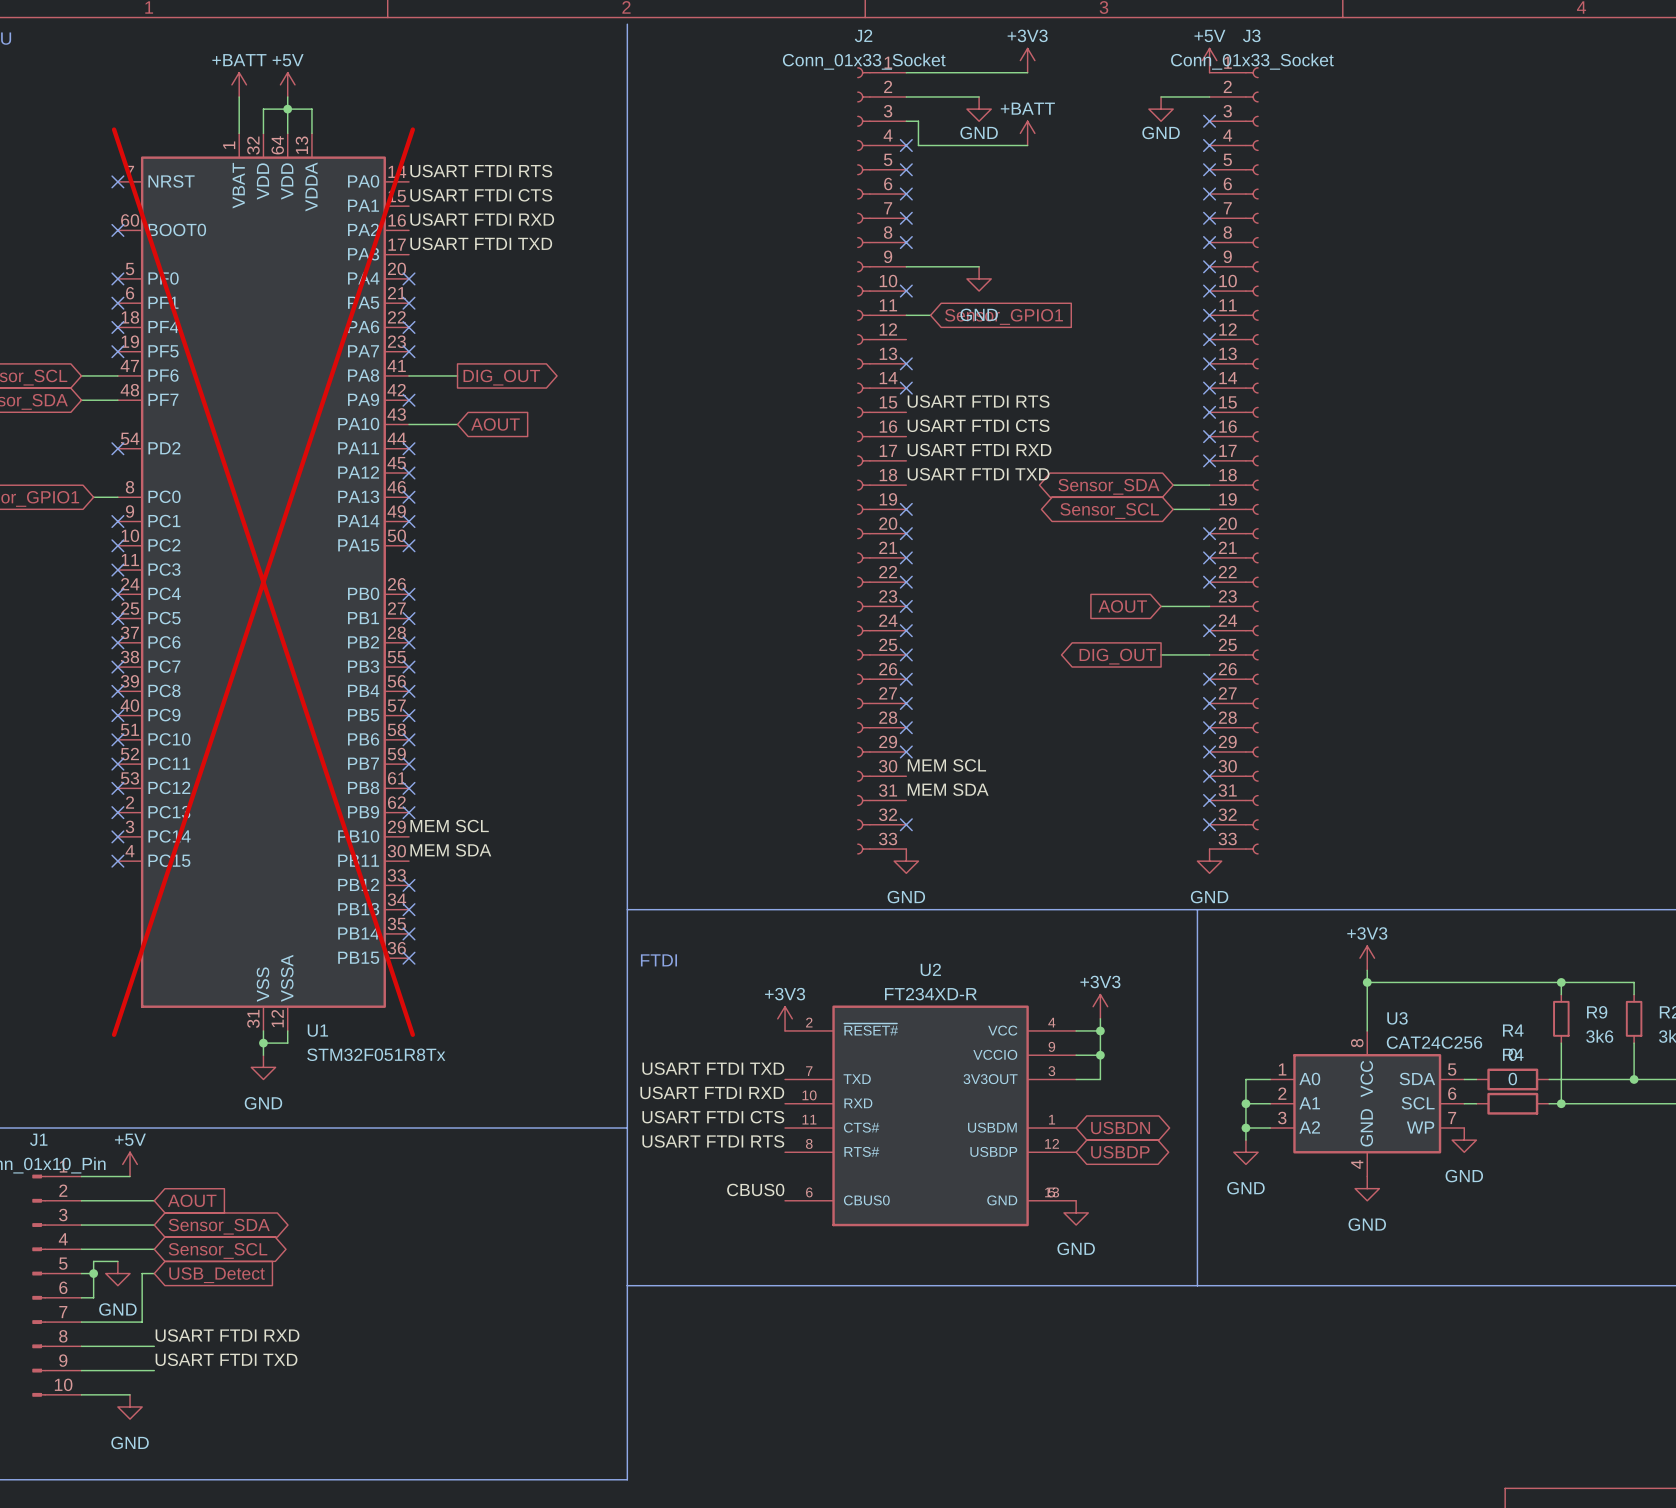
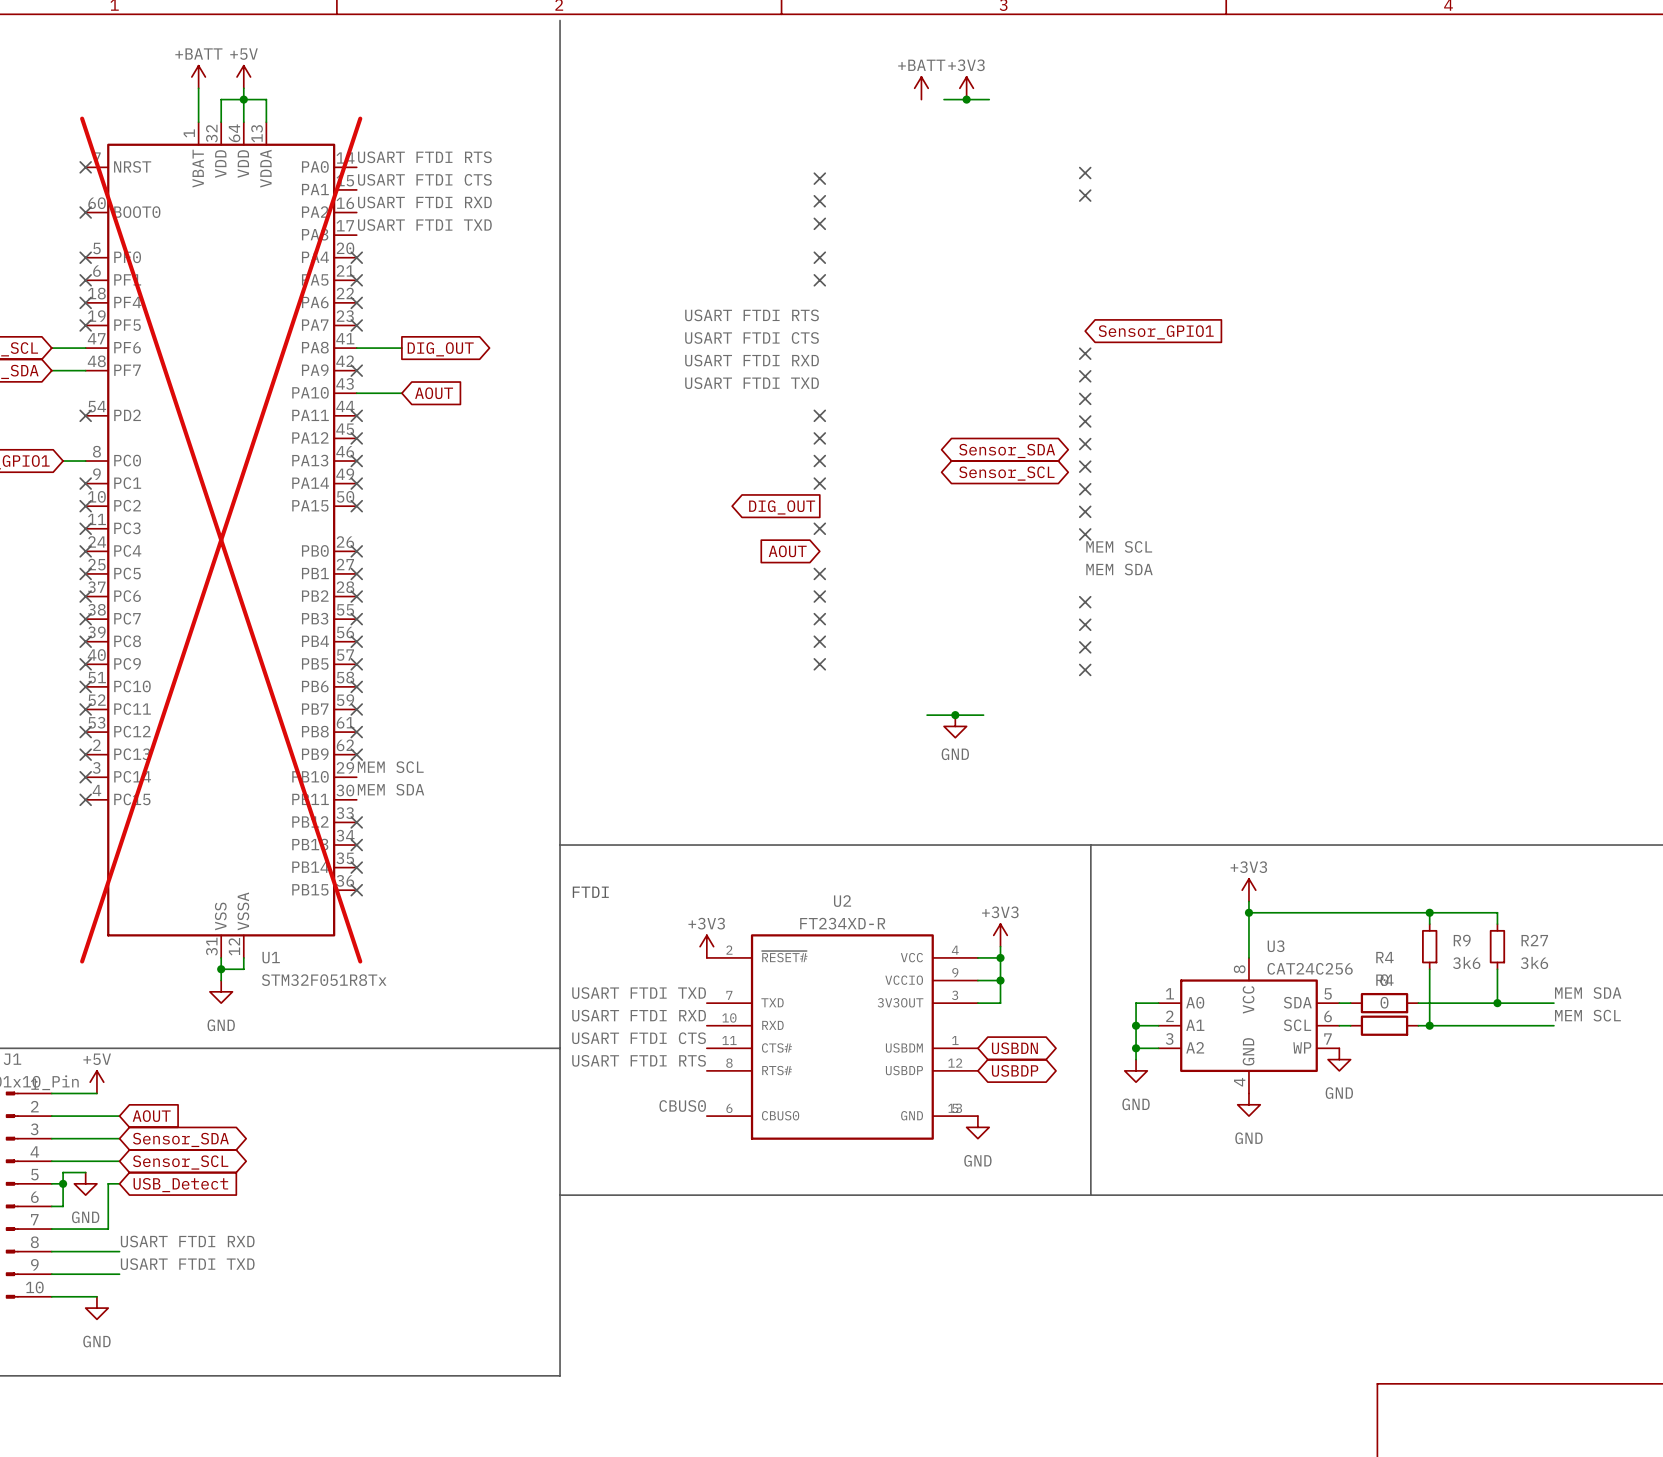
power symbol position: +3V3 (1027, 60) -> +3V3 (966, 88)
power symbol: +5V (1209, 60) -> none
wire: (906, 72) (1027, 72) -> none
wire: (906, 96) (979, 96) -> none
wire: (1161, 96) (1209, 96) -> (944, 99) (989, 99)
power symbol: GND (979, 109) -> none
junction: none -> (966, 99)
power symbol: GND (1161, 109) -> none
wire: (906, 121) (918, 121) (918, 145) (1027, 145) -> none
no-connect mark: (1209, 121) -> none
power symbol position: +BATT (1027, 133) -> +BATT (921, 88)
no-connect mark: (906, 145) -> none
no-connect mark: (1209, 145) -> none
no-connect mark: (906, 169) -> none
no-connect mark: (1209, 169) -> none
no-connect mark: none -> (1085, 173)
no-connect mark: (1209, 194) -> none
no-connect mark: none -> (1085, 195)
no-connect mark: (1209, 218) -> none
no-connect mark: (1209, 242) -> none
wire: (906, 266) (979, 266) -> none
no-connect mark: (1209, 266) -> none
no-connect mark: none -> (819, 257)
power symbol: GND (979, 278) -> none
no-connect mark: (906, 291) -> none
no-connect mark: (1209, 291) -> none
no-connect mark: none -> (819, 280)
wire: (906, 315) (930, 315) -> none
no-connect mark: (1209, 315) -> none
global label: Sensor_GPIO1 (1003, 316) -> none
no-connect mark: (1209, 339) -> none
global label: none -> Sensor_GPIO1 (1156, 332)
no-connect mark: (906, 363) -> none
no-connect mark: (1209, 363) -> none
no-connect mark: none -> (1085, 353)
no-connect mark: (906, 388) -> none
no-connect mark: (1209, 388) -> none
label position: USART FTDI RTS (978, 401) -> USART FTDI RTS (752, 315)
no-connect mark: none -> (1085, 376)
no-connect mark: (1209, 412) -> none
label position: USART FTDI CTS (978, 425) -> USART FTDI CTS (752, 337)
no-connect mark: none -> (1085, 398)
no-connect mark: (1209, 436) -> none
no-connect mark: none -> (819, 415)
label position: USART FTDI RXD (979, 450) -> USART FTDI RXD (752, 360)
no-connect mark: none -> (1085, 421)
J2: Conn_01x33_Socket (881, 460) -> none
no-connect mark: (1209, 460) -> none
J3: Conn_01x33_Socket (1234, 460) -> none
no-connect mark: none -> (819, 438)
label position: USART FTDI TXD (978, 474) -> USART FTDI TXD (752, 383)
no-connect mark: none -> (1085, 444)
wire: (1173, 485) (1209, 485) -> none
no-connect mark: none -> (819, 461)
no-connect mark: none -> (1085, 466)
no-connect mark: (906, 509) -> none
wire: (1173, 509) (1209, 509) -> none
no-connect mark: none -> (819, 483)
no-connect mark: none -> (1085, 489)
no-connect mark: (906, 533) -> none
no-connect mark: (1209, 533) -> none
global label: none -> DIG_OUT (782, 507)
no-connect mark: none -> (1085, 511)
no-connect mark: (906, 557) -> none
no-connect mark: (1209, 557) -> none
no-connect mark: none -> (819, 528)
no-connect mark: none -> (1085, 534)
no-connect mark: (906, 582) -> none
no-connect mark: (1209, 582) -> none
label: none -> MEM SCL (1119, 546)
global label: none -> AOUT (787, 551)
no-connect mark: (906, 606) -> none
global label: AOUT (1122, 606) -> none
wire: (1161, 606) (1209, 606) -> none
label: none -> MEM SDA (1119, 569)
no-connect mark: none -> (819, 573)
no-connect mark: (906, 630) -> none
no-connect mark: (1209, 630) -> none
no-connect mark: none -> (819, 596)
no-connect mark: none -> (1085, 602)
no-connect mark: (906, 654) -> none
wire: (1161, 654) (1209, 654) -> none
global label: DIG_OUT (1117, 656) -> none
no-connect mark: none -> (819, 619)
no-connect mark: none -> (1085, 624)
no-connect mark: (906, 679) -> none
no-connect mark: (1209, 679) -> none
no-connect mark: none -> (819, 641)
no-connect mark: none -> (1085, 647)
no-connect mark: (906, 703) -> none
no-connect mark: (1209, 703) -> none
no-connect mark: none -> (819, 664)
no-connect mark: none -> (1085, 669)
no-connect mark: (906, 727) -> none
no-connect mark: (1209, 727) -> none
no-connect mark: (906, 751) -> none
no-connect mark: (1209, 751) -> none
label: MEM SCL (946, 765) -> none
wire: none -> (927, 715) (983, 715)
junction: none -> (955, 715)
no-connect mark: (1209, 776) -> none
power symbol: none -> GND (955, 726)
label: MEM SDA (948, 789) -> none
no-connect mark: (1209, 800) -> none
no-connect mark: (906, 824) -> none
no-connect mark: (1209, 824) -> none
power symbol: GND (906, 861) -> none
power symbol: GND (1209, 861) -> none

